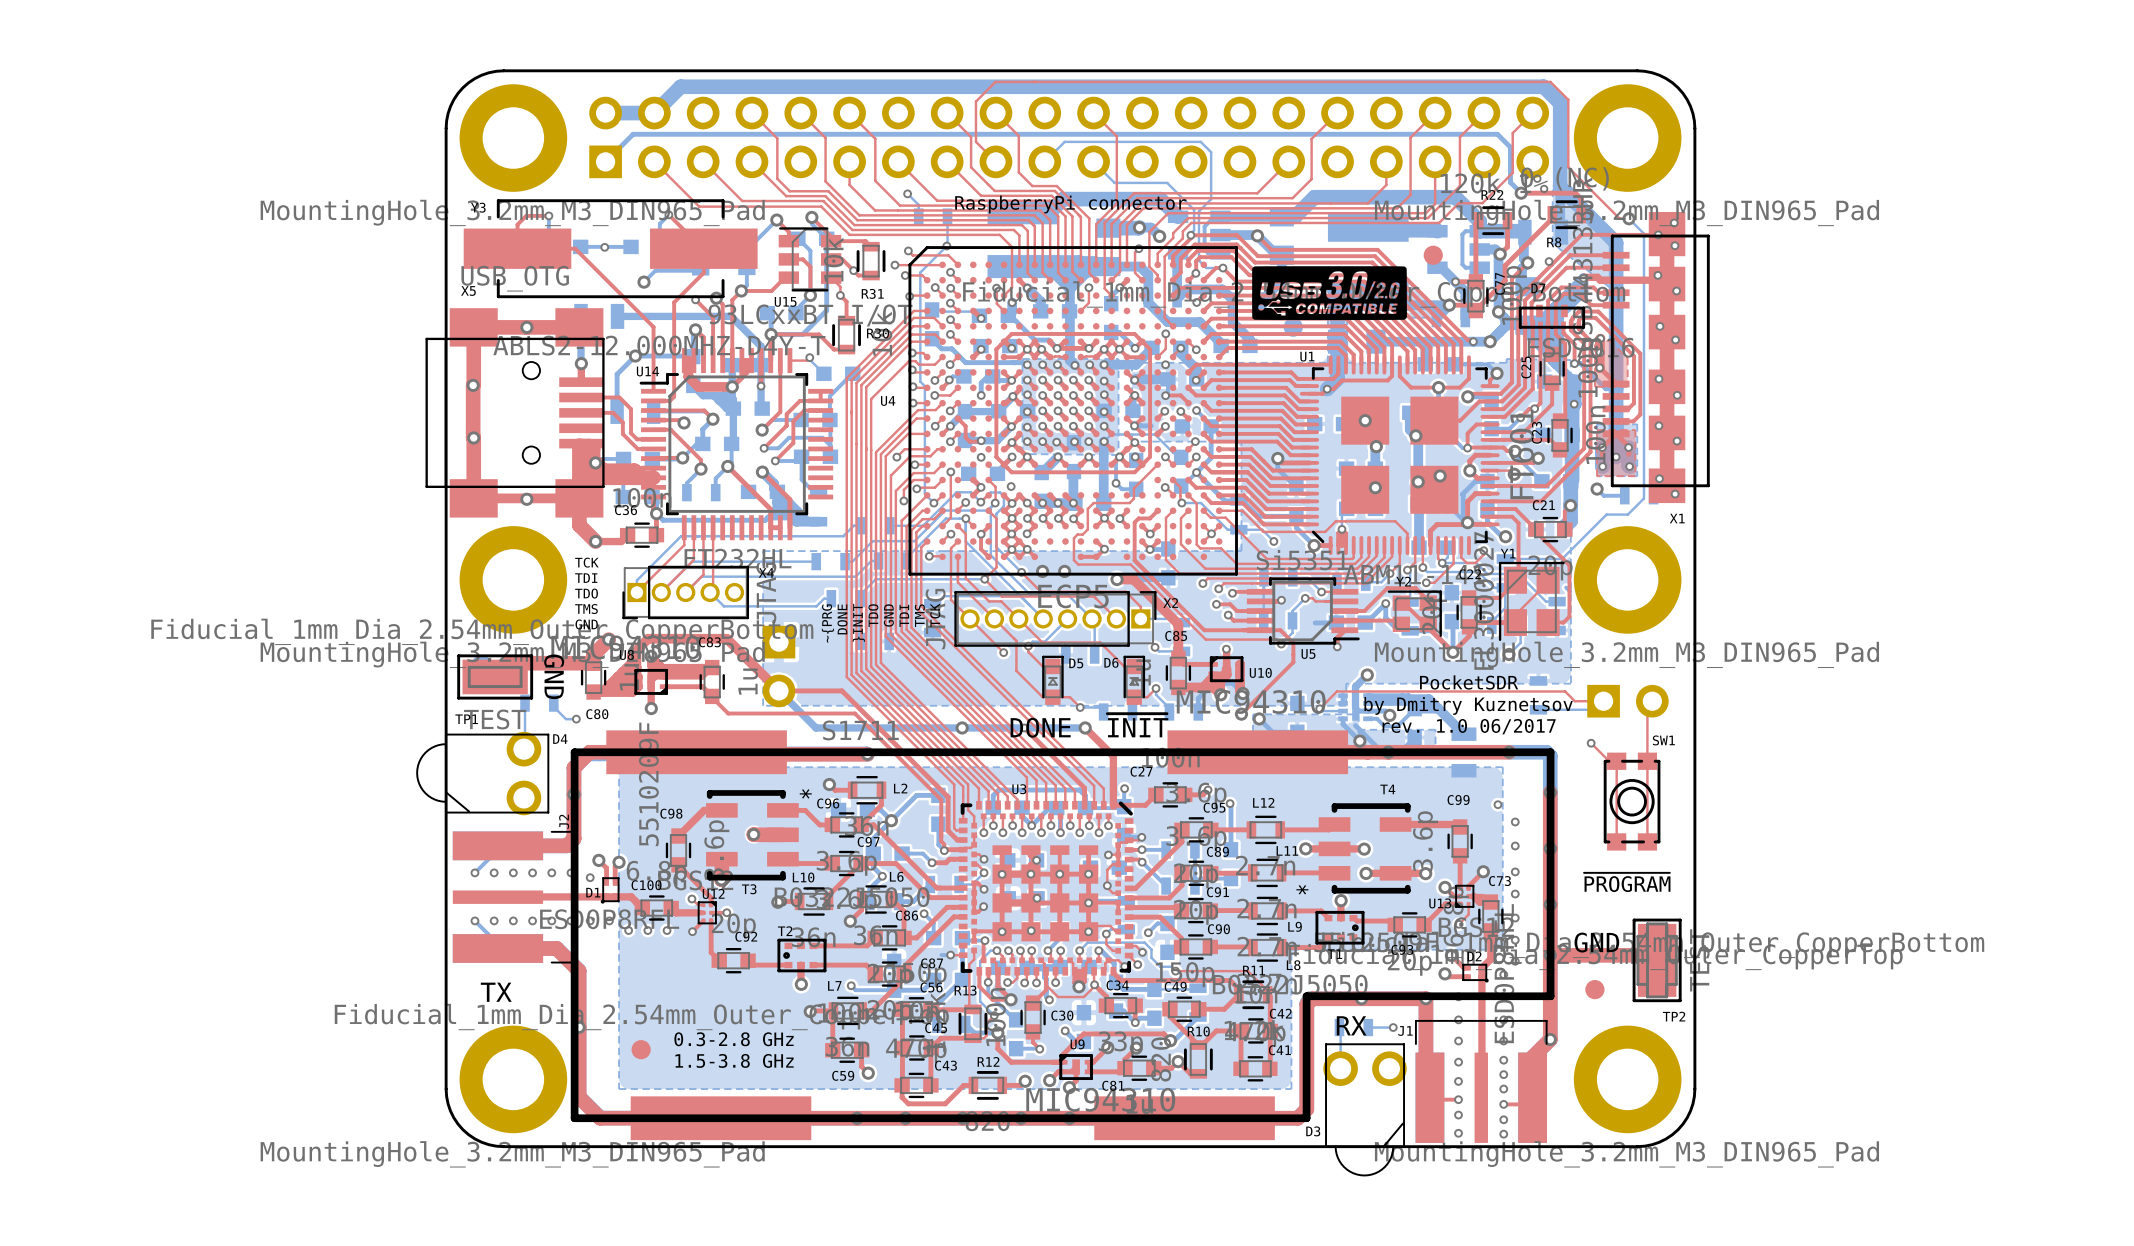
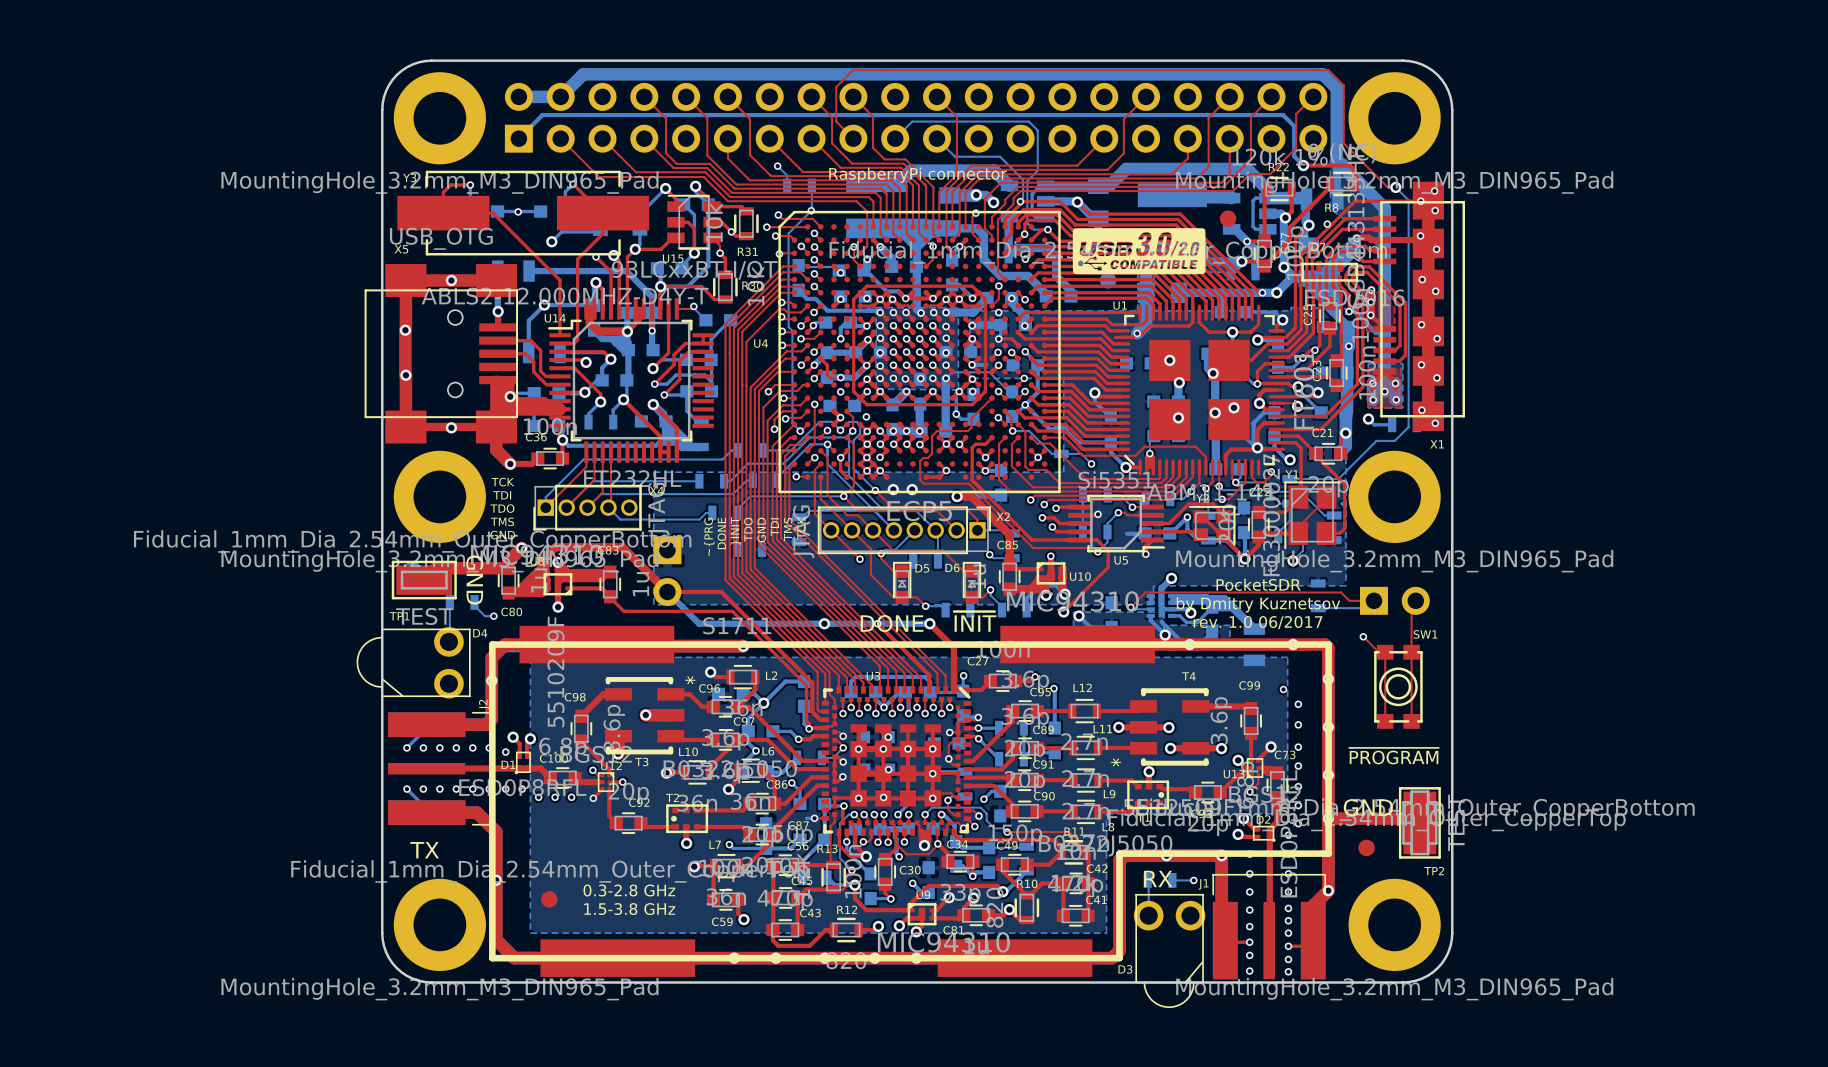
bottom track: (1509, 752) (1546, 752) (1550, 756) (1550, 792) -> none
top track: none -> (1293, 644) (1325, 644) (1328, 647) (1328, 679)

